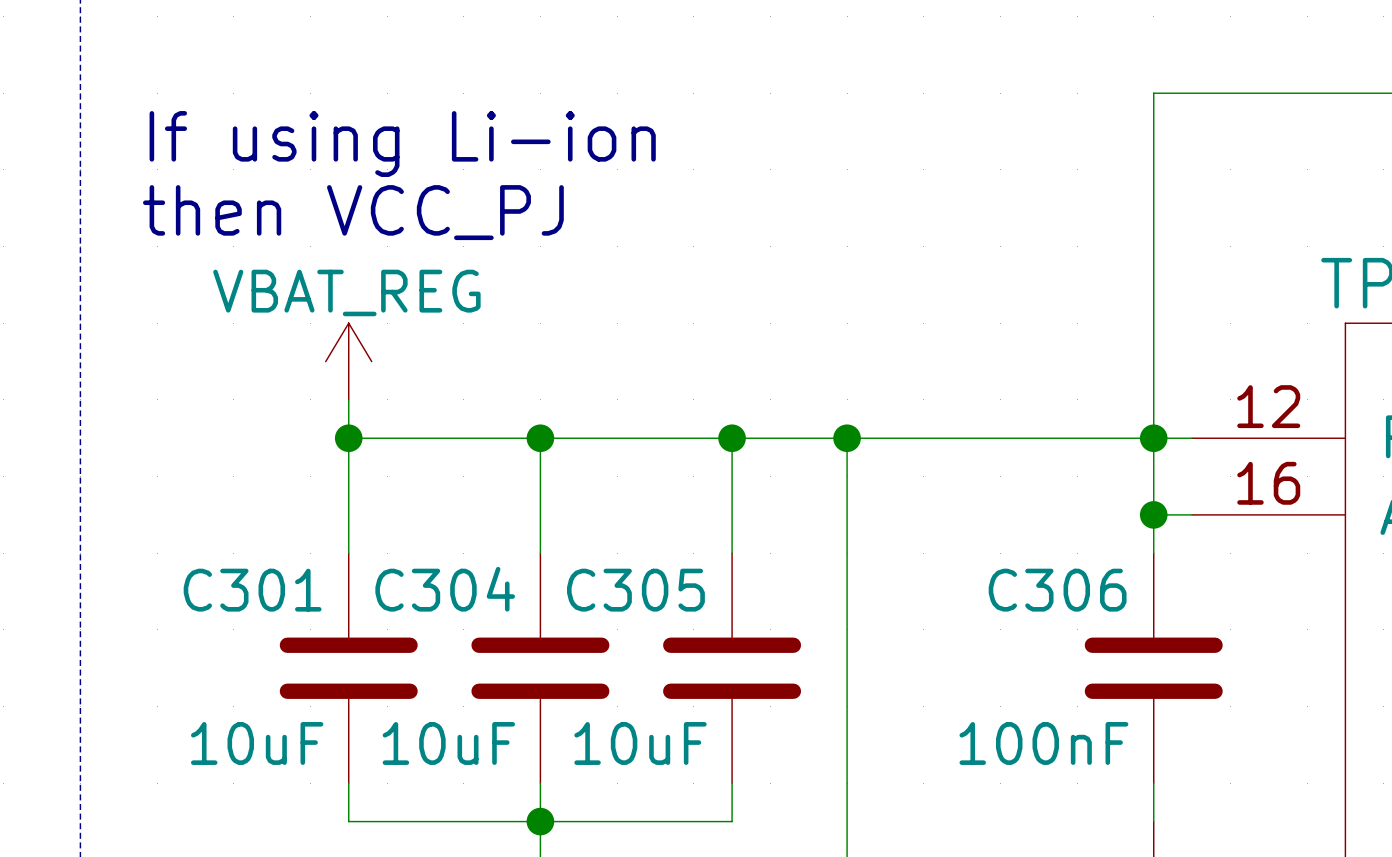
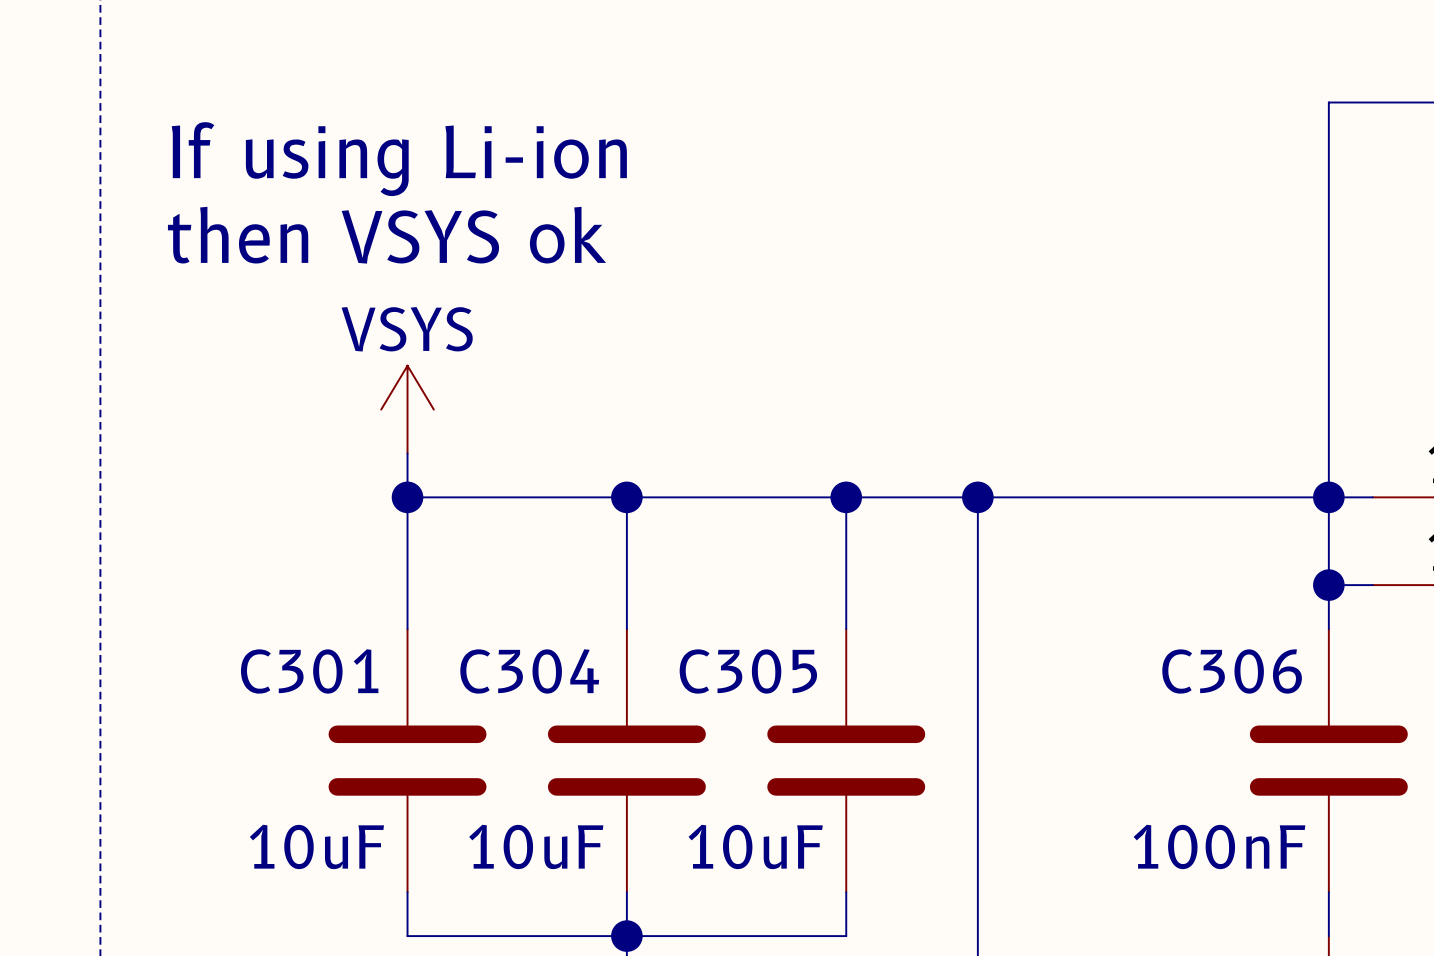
text: then VCC_PJ (353, 212) -> then VSYS ok (387, 235)
power symbol: VBAT_REG (348, 361) -> VSYS (407, 409)

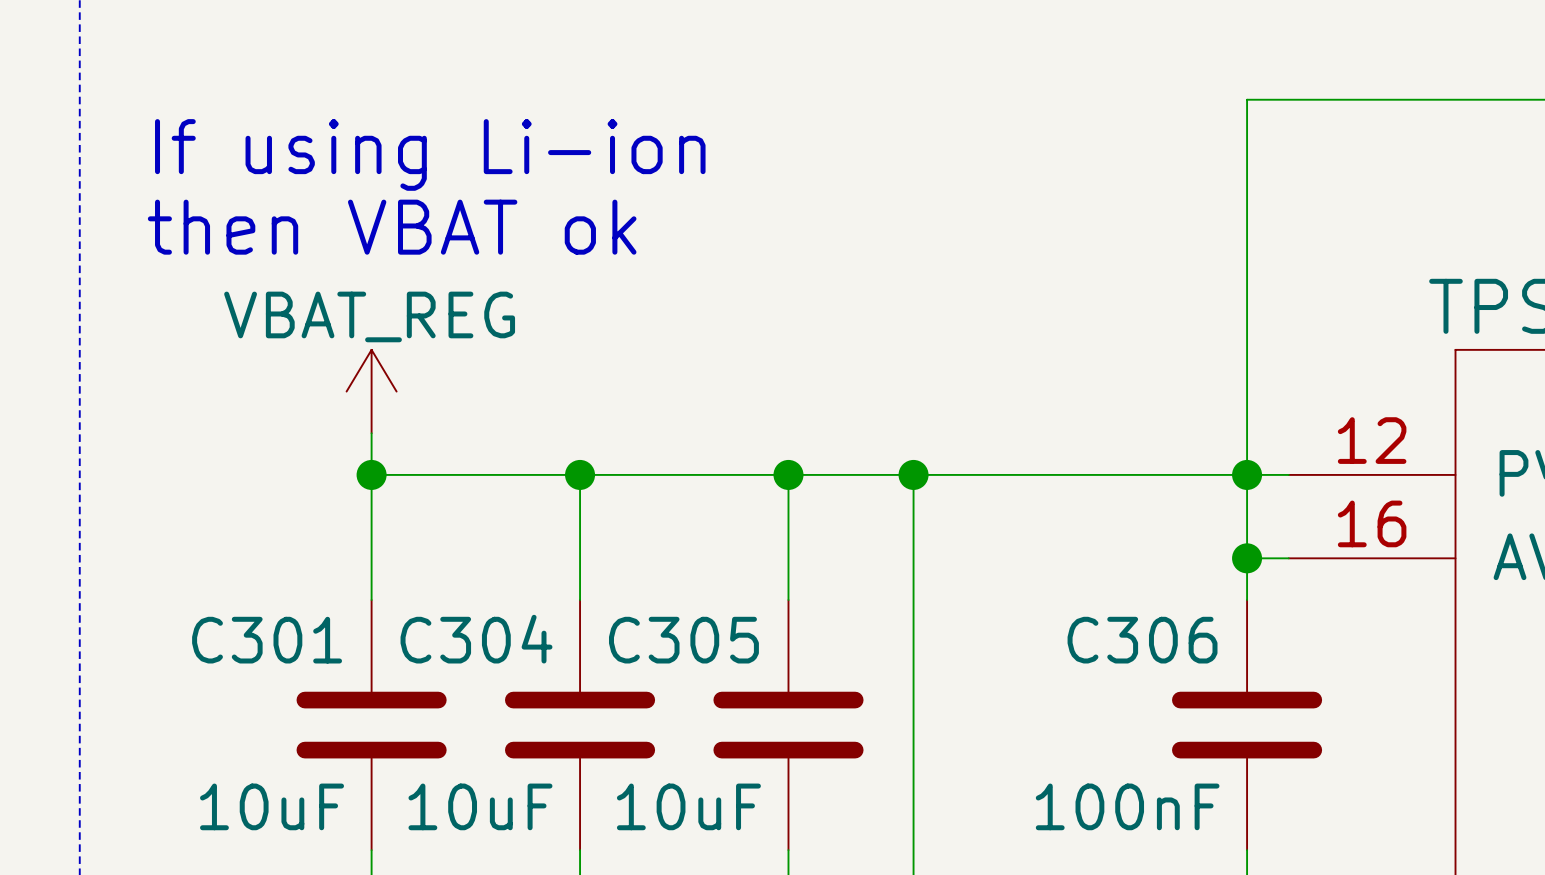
text: then VSYS ok (387, 235) -> then VBAT ok (392, 227)
power symbol: VSYS (407, 409) -> VBAT_REG (371, 391)

